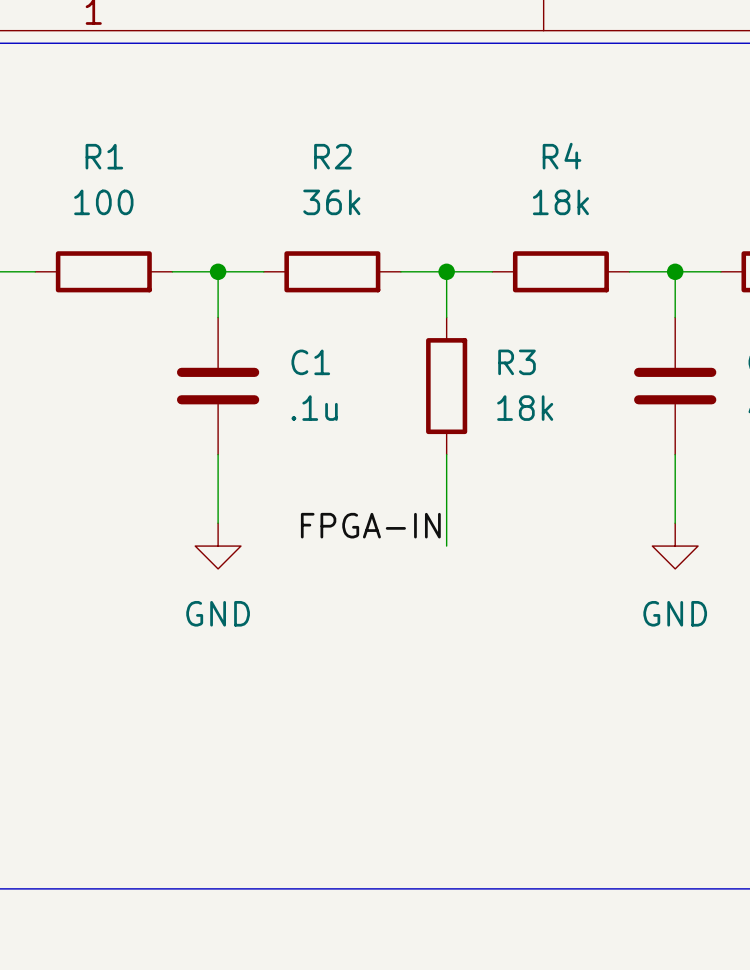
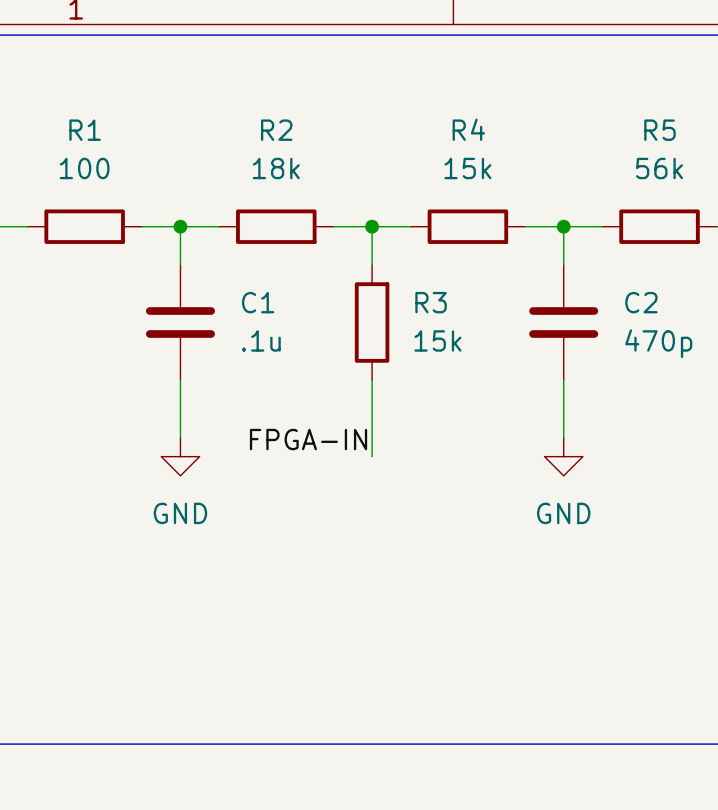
R2 value: 36k (331, 202) -> 18k (276, 168)
R4 value: 18k (560, 202) -> 15k (467, 168)
R3 value: 18k (525, 408) -> 15k (437, 340)

